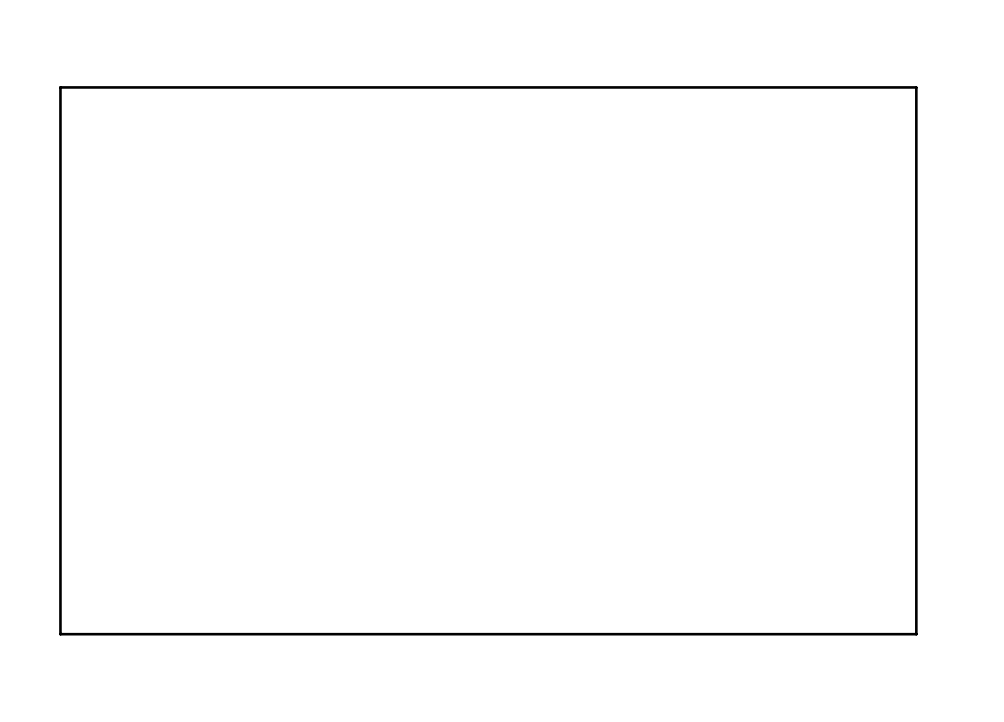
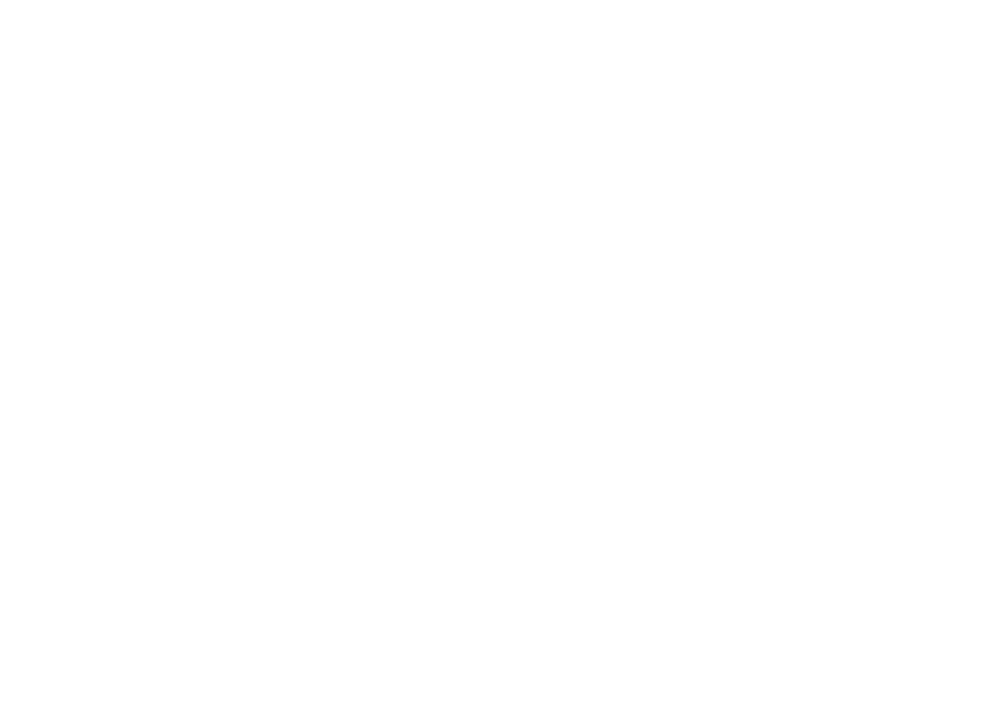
board edge: (916, 87) (60, 87) (60, 634) (916, 634) (916, 87) -> none

